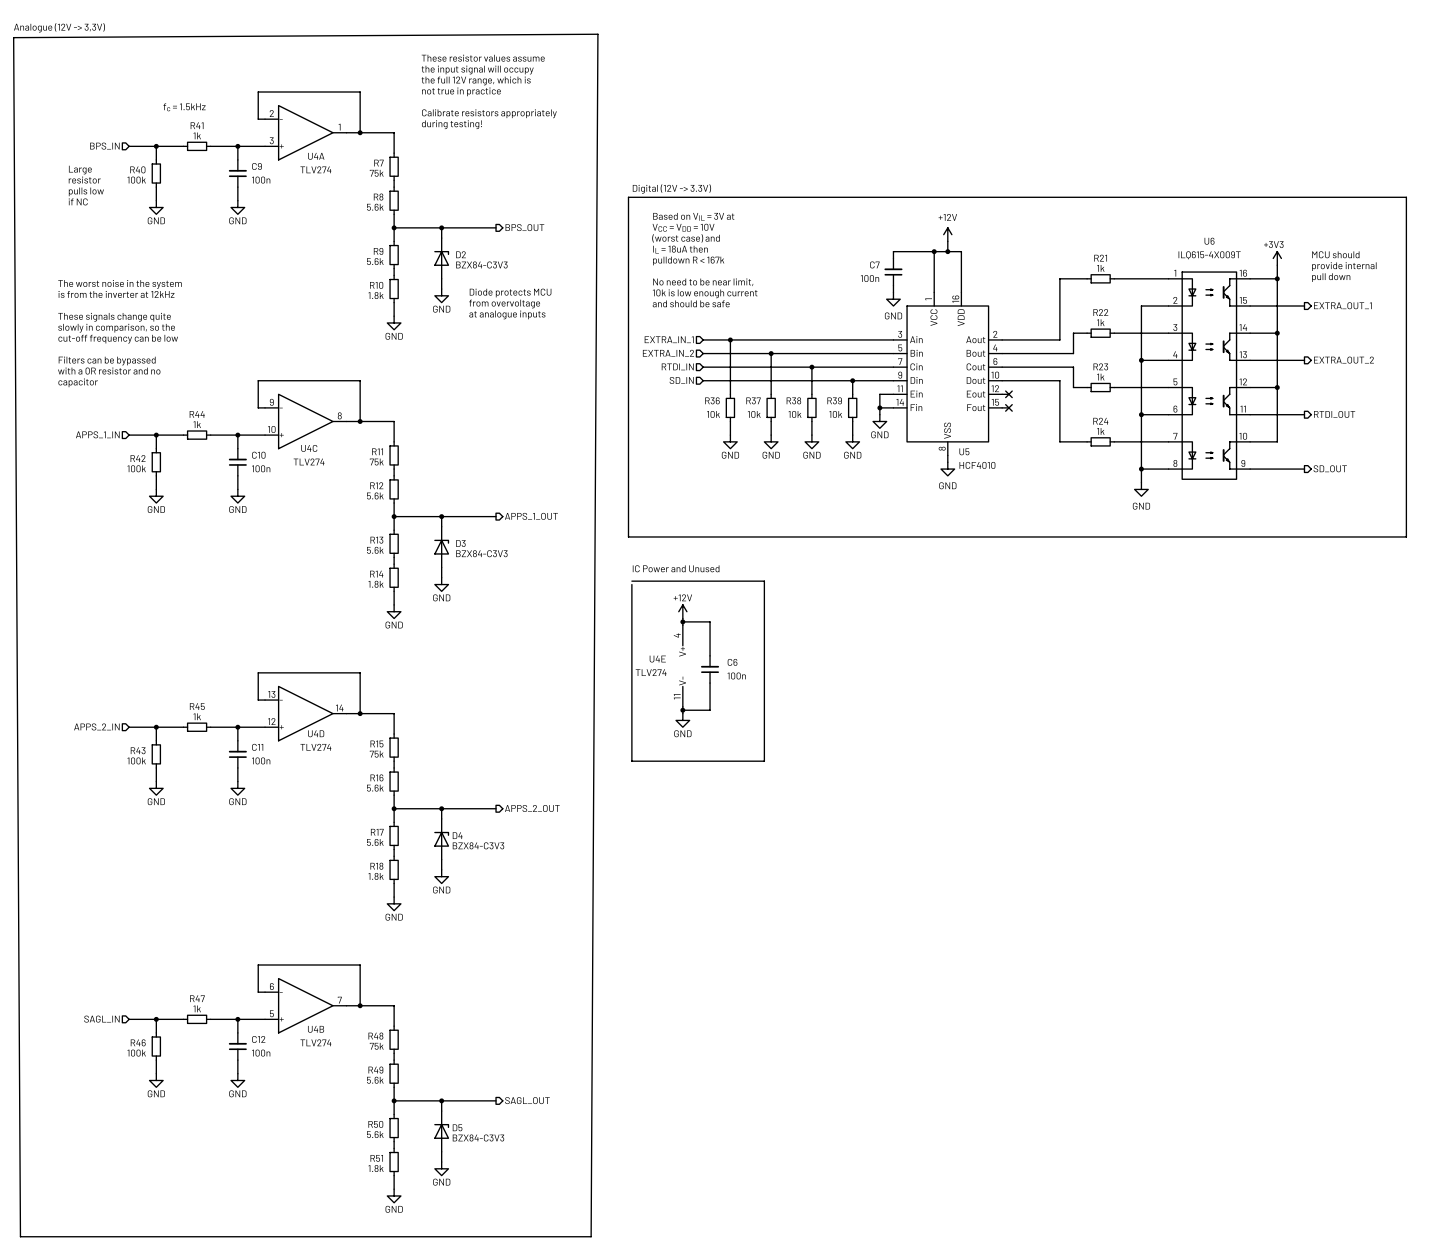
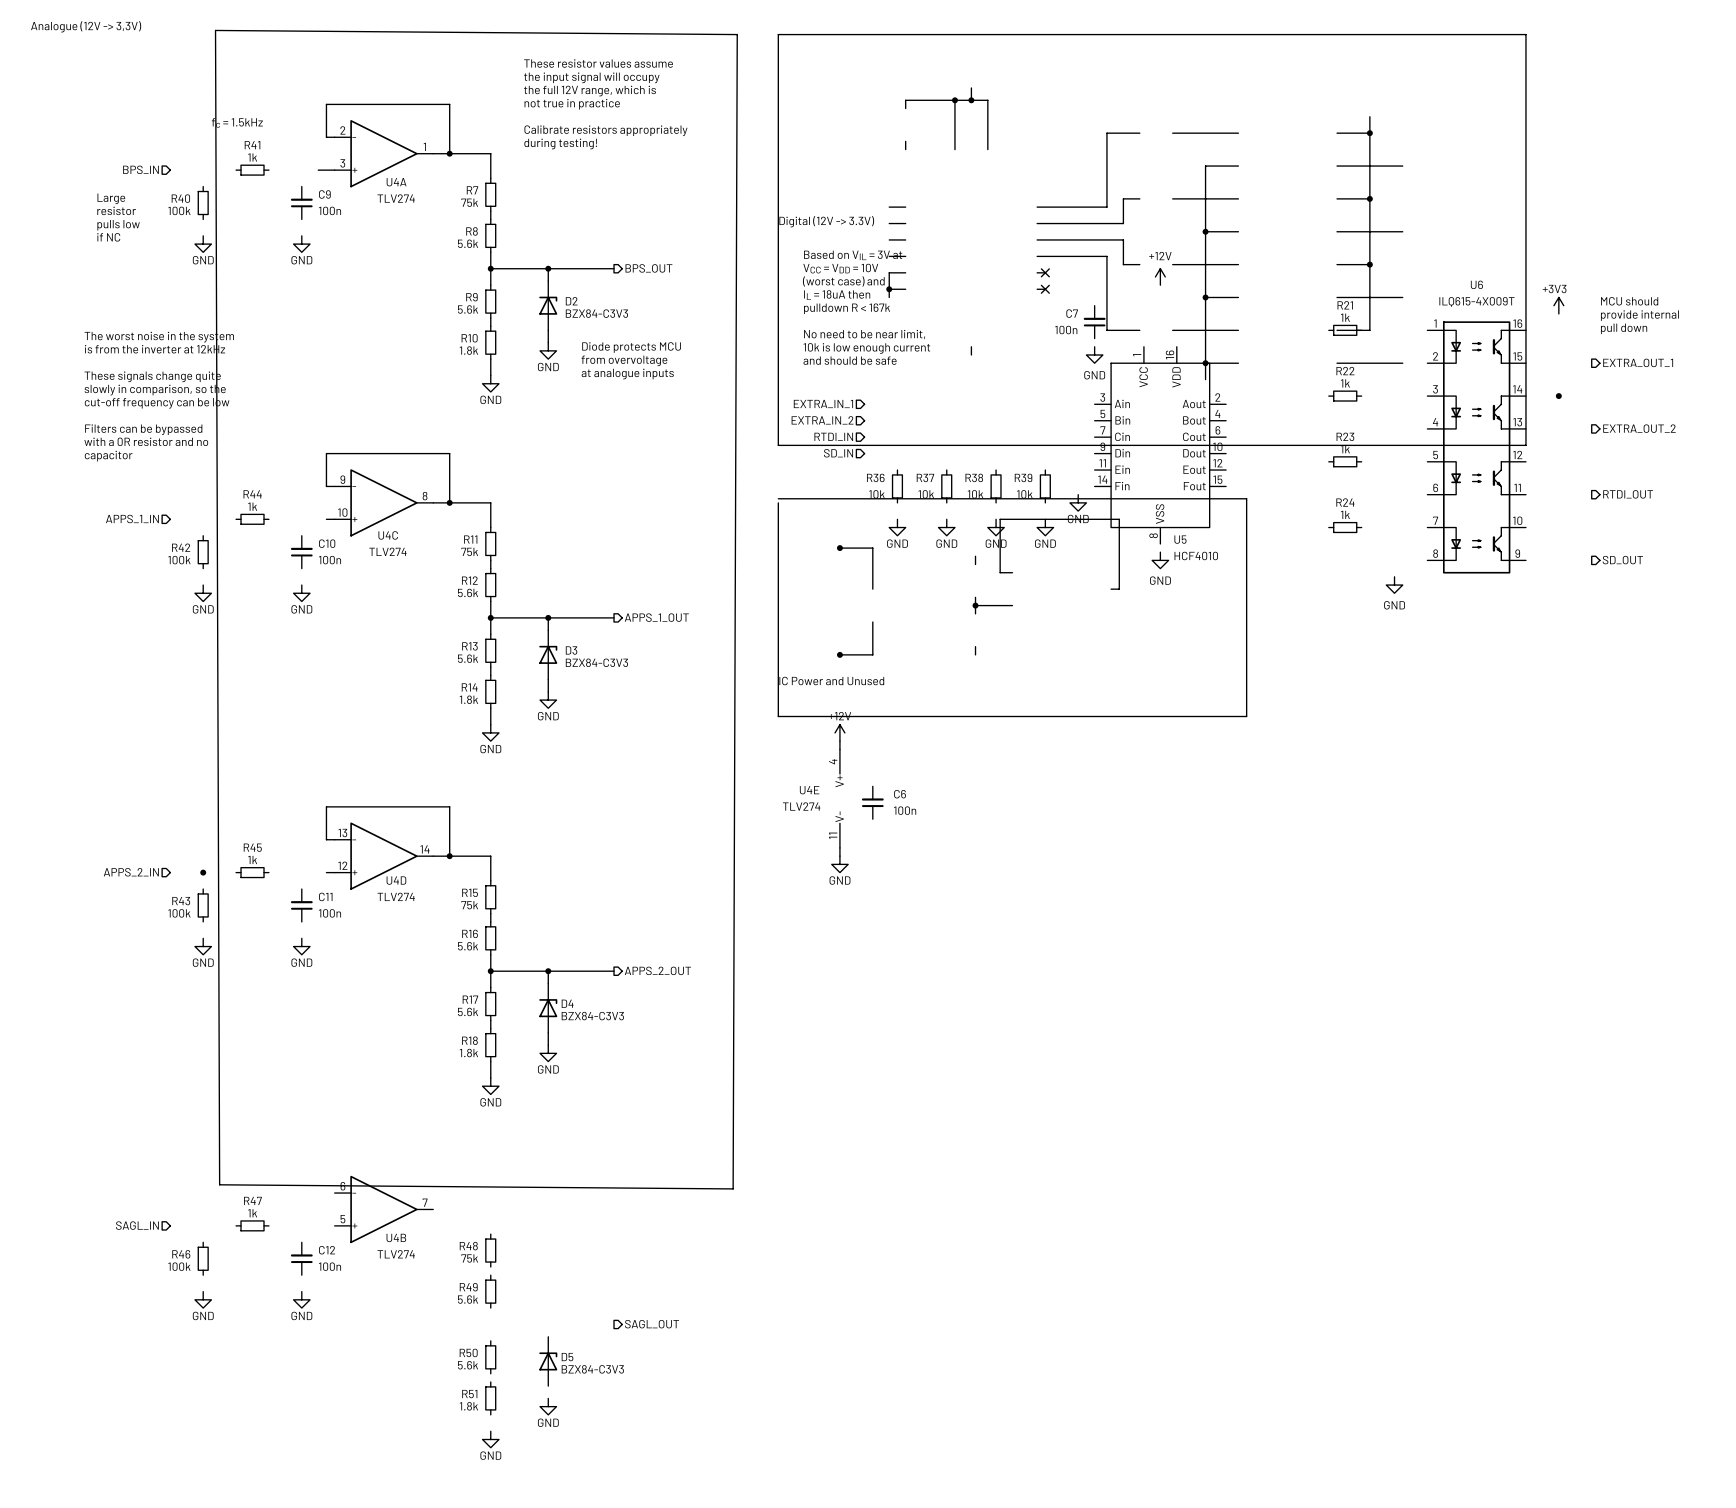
line: (597, 34) (13, 37) (20, 1236) (591, 1236) (597, 34) -> (215, 30) (219, 1184) (733, 1188) (737, 34) (215, 30)
line: none -> (778, 34) (778, 445) (1525, 445) (1525, 34) (778, 34)
wire: none -> (971, 87) (971, 100)
wire: none -> (954, 100) (954, 149)
junction: none -> (954, 100)
junction: none -> (971, 100)
wire: none -> (905, 108) (905, 100) (987, 100) (987, 149)
wire: none -> (1139, 133) (1106, 133) (1106, 207) (1037, 207)
wire: none -> (1172, 133) (1238, 133)
wire: none -> (1337, 133) (1369, 133)
junction: none -> (1369, 133)
wire: none -> (905, 141) (905, 149)
wire: none -> (1238, 166) (1205, 166) (1205, 379)
wire: none -> (1337, 166) (1402, 166)
wire: (129, 146) (183, 146) -> none
wire: (156, 146) (156, 159) -> none
junction: (156, 146) -> none
wire: (210, 146) (251, 146) -> none
wire: (237, 146) (237, 159) -> none
junction: (237, 146) -> none
wire: none -> (1139, 198) (1123, 198) (1123, 223) (1037, 223)
wire: none -> (1172, 198) (1238, 198)
wire: none -> (1337, 198) (1369, 198)
junction: none -> (1369, 198)
wire: none -> (889, 207) (905, 207)
wire: (156, 187) (156, 200) -> none
wire: (237, 187) (237, 200) -> none
wire: none -> (889, 223) (905, 223)
line: (628, 197) (628, 536) (1406, 536) (1406, 197) (628, 197) -> none
junction: none -> (1205, 231)
wire: none -> (889, 239) (905, 239)
wire: none -> (1037, 239) (1123, 239) (1123, 264) (1139, 264)
wire: none -> (889, 256) (905, 256)
wire: none -> (1037, 256) (1106, 256) (1106, 330) (1139, 330)
wire: none -> (1172, 264) (1238, 264)
wire: none -> (1337, 264) (1369, 264)
junction: none -> (1369, 264)
wire: none -> (905, 272) (889, 272) (889, 297)
wire: none -> (1037, 272) (1045, 272)
no-connect mark: none -> (1045, 272)
wire: (947, 241) (947, 251) -> none
wire: none -> (889, 289) (905, 289)
junction: none -> (889, 289)
wire: none -> (1037, 289) (1045, 289)
no-connect mark: none -> (1045, 289)
wire: (934, 251) (934, 292) -> none
junction: (934, 251) -> none
junction: (947, 251) -> none
wire: none -> (1205, 297) (1238, 297)
junction: none -> (1205, 297)
wire: (893, 258) (893, 251) (961, 251) (961, 292) -> none
wire: (1277, 265) (1277, 441) (1250, 441) -> none
wire: none -> (1172, 330) (1238, 330)
wire: (1087, 278) (1059, 278) (1059, 339) (1002, 339) -> none
wire: (1121, 278) (1168, 278) -> (1369, 330) (1369, 116)
wire: (1250, 278) (1277, 278) -> none
junction: (1277, 278) -> none
wire: (893, 285) (893, 292) -> (971, 346) (971, 354)
wire: none -> (1205, 363) (1238, 363)
junction: none -> (1205, 363)
wire: (1141, 306) (1141, 482) -> (1394, 363) (1337, 363)
wire: (1148, 306) (1168, 306) -> (1337, 330) (1361, 330)
wire: (1250, 306) (1304, 306) -> none
wire: (1087, 333) (1073, 333) (1073, 353) (1002, 353) -> none
wire: (1114, 333) (1168, 333) -> (1337, 297) (1402, 297)
wire: (1250, 333) (1277, 333) -> none
wire: (703, 339) (893, 339) -> none
wire: (730, 339) (730, 394) -> none
junction: (730, 339) -> none
wire: (703, 353) (893, 353) -> none
wire: (771, 353) (771, 394) -> none
junction: (771, 353) -> none
wire: (1141, 360) (1168, 360) -> none
junction: (1141, 360) -> none
wire: (1250, 360) (1304, 360) -> none
wire: (703, 367) (893, 367) -> none
wire: (811, 367) (811, 394) -> none
junction: (811, 367) -> none
wire: (1002, 367) (1073, 367) (1073, 387) (1087, 387) -> none
wire: (703, 380) (893, 380) -> none
wire: (852, 380) (852, 394) -> none
junction: (852, 380) -> none
wire: (1002, 380) (1059, 380) (1059, 441) (1087, 441) -> none
wire: (1114, 387) (1168, 387) -> none
wire: (1250, 387) (1277, 387) -> none
junction: (1277, 387) -> none
wire: (893, 394) (879, 394) (879, 414) -> none
wire: (1002, 394) (1008, 394) -> none
no-connect mark: (1008, 394) -> none
wire: (879, 407) (893, 407) -> none
junction: (879, 407) -> none
wire: (1002, 407) (1008, 407) -> none
no-connect mark: (1008, 407) -> none
wire: (1141, 414) (1168, 414) -> none
junction: (1141, 414) -> none
wire: (1250, 414) (1304, 414) -> none
line: none -> (778, 502) (778, 700)
wire: (730, 421) (730, 435) -> none
wire: (771, 421) (771, 435) -> none
wire: (811, 421) (811, 435) -> (975, 597) (975, 613)
wire: (852, 421) (852, 435) -> none
wire: (129, 435) (183, 435) -> none
wire: (156, 435) (156, 448) -> none
junction: (156, 435) -> none
wire: (210, 435) (258, 435) -> none
wire: (237, 435) (237, 448) -> none
junction: (237, 435) -> none
wire: (1114, 441) (1168, 441) -> none
wire: (947, 455) (947, 462) -> none
wire: none -> (839, 548) (872, 548) (872, 589)
junction: none -> (839, 548)
wire: none -> (975, 556) (975, 564)
wire: (1141, 469) (1168, 469) -> none
junction: (1141, 469) -> none
wire: (1250, 469) (1304, 469) -> none
wire: (156, 475) (156, 489) -> none
wire: (237, 475) (237, 489) -> none
wire: none -> (1012, 572) (1000, 572) (1000, 519) (1119, 519) (1119, 589) (1111, 589)
wire: none -> (975, 605) (1012, 605)
junction: none -> (975, 605)
wire: none -> (872, 622) (872, 654) (839, 654)
wire: none -> (975, 646) (975, 654)
junction: none -> (839, 654)
line: (631, 581) (764, 581) (764, 761) (631, 761) (631, 598) -> (778, 498) (1246, 498) (1246, 716) (778, 716)
wire: (682, 621) (710, 621) (710, 655) -> none
junction: (682, 621) -> none
wire: (710, 683) (710, 710) (682, 710) -> none
junction: (682, 710) -> none
wire: (129, 727) (183, 727) -> none
wire: (156, 727) (156, 740) -> none
wire: (210, 727) (258, 727) -> none
wire: (237, 727) (237, 740) -> none
junction: (237, 727) -> none
wire: (156, 767) (156, 781) -> none
wire: (237, 767) (237, 781) -> none
wire: (265, 992) (258, 992) (258, 965) (360, 965) (360, 1005) -> none
wire: (346, 1005) (394, 1005) (394, 1026) -> none
junction: (360, 1005) -> none
wire: (129, 1019) (183, 1019) -> none
wire: (156, 1019) (156, 1032) -> none
junction: (156, 1019) -> none
wire: (210, 1019) (265, 1019) -> none
wire: (237, 1019) (237, 1032) -> none
junction: (237, 1019) -> none
wire: (394, 1053) (394, 1060) -> none
wire: (156, 1060) (156, 1073) -> none
wire: (237, 1060) (237, 1073) -> none
wire: (394, 1087) (394, 1114) -> none
wire: (394, 1100) (496, 1100) -> none
junction: (394, 1100) -> none
wire: (441, 1100) (441, 1111) -> none
junction: (441, 1100) -> none
wire: (394, 1141) (394, 1148) -> none
wire: (441, 1151) (441, 1162) -> none
wire: (394, 1175) (394, 1189) -> none

